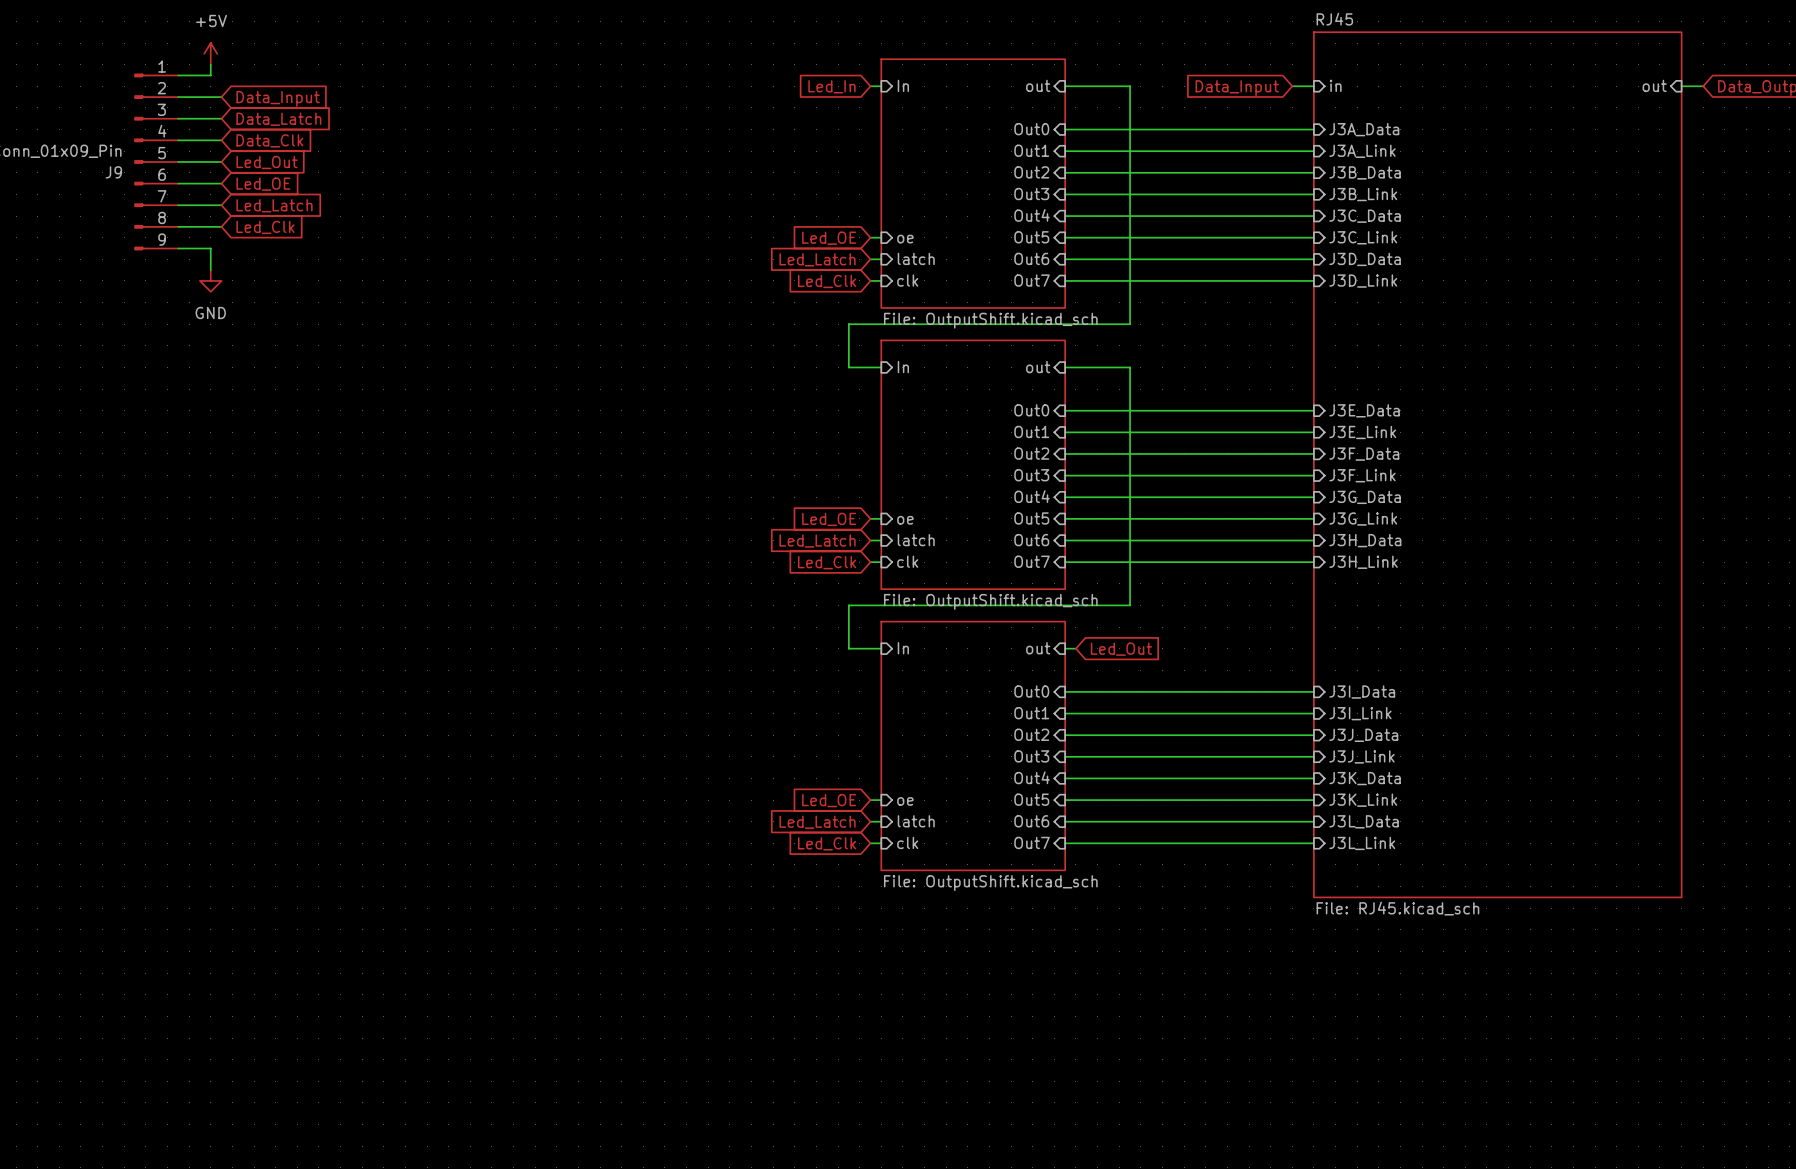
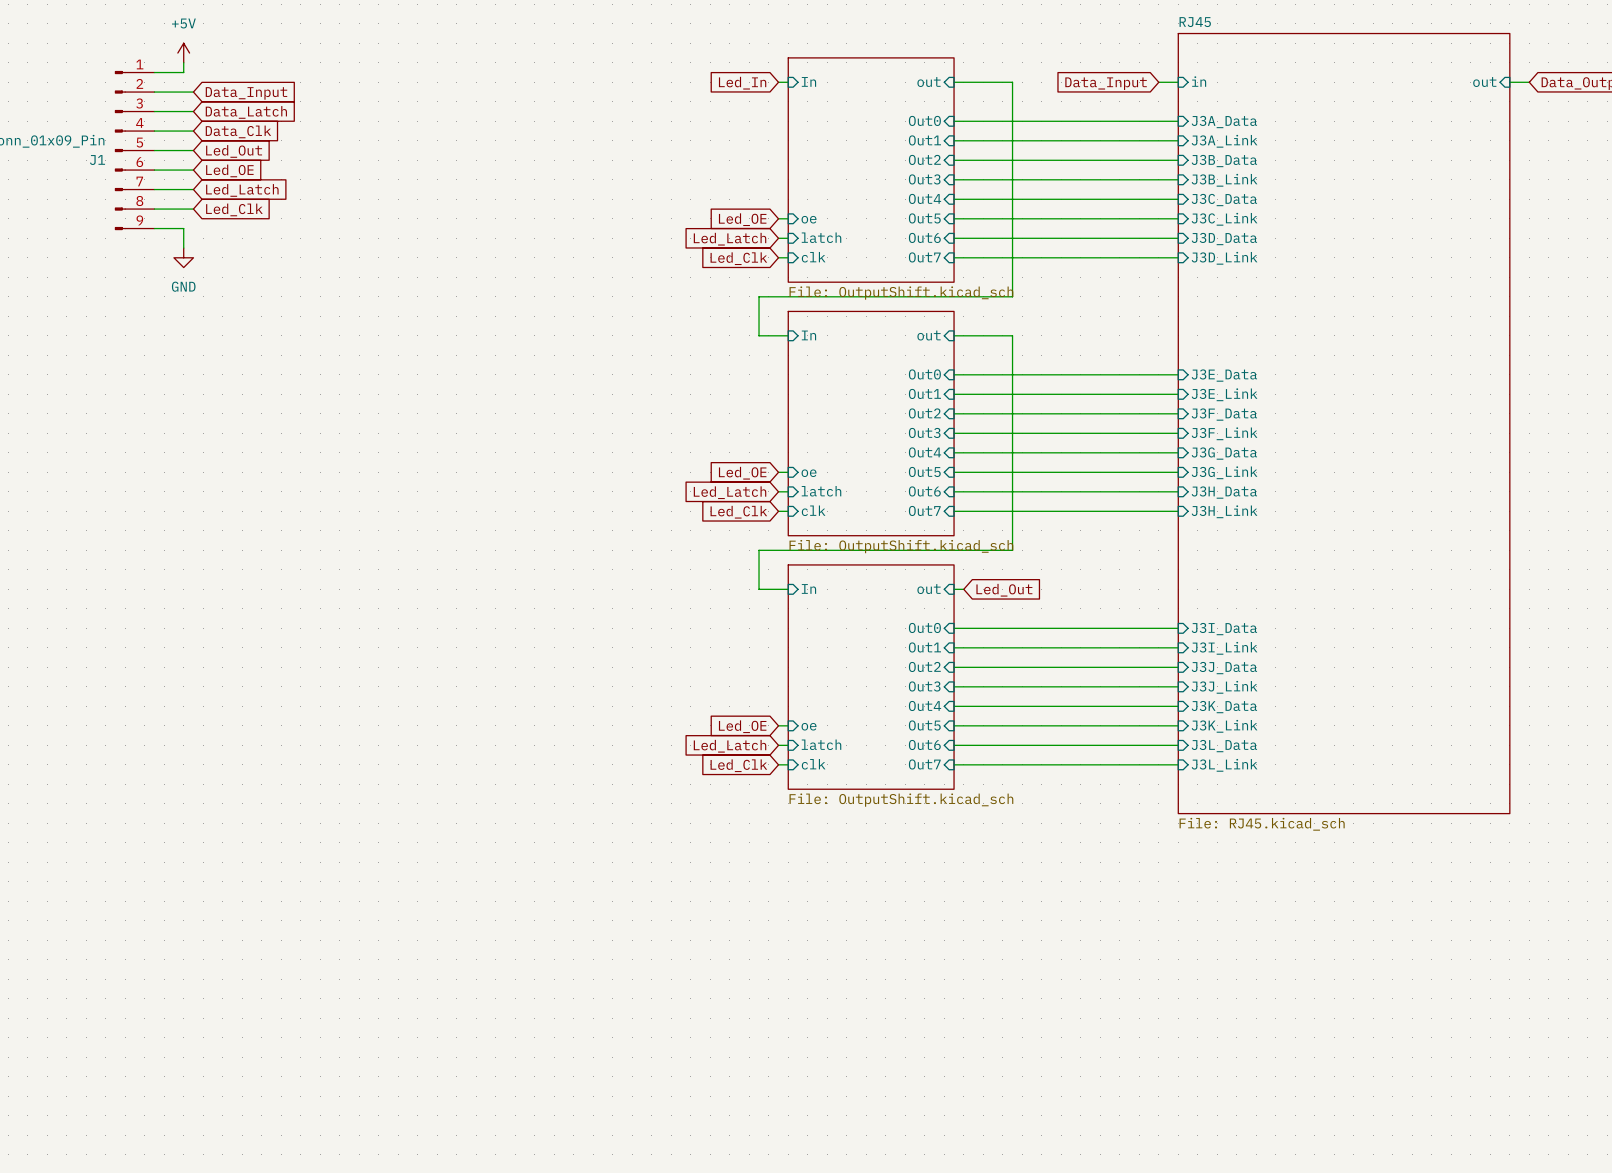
J9 name: J9 (113, 172) -> J1 (97, 160)

